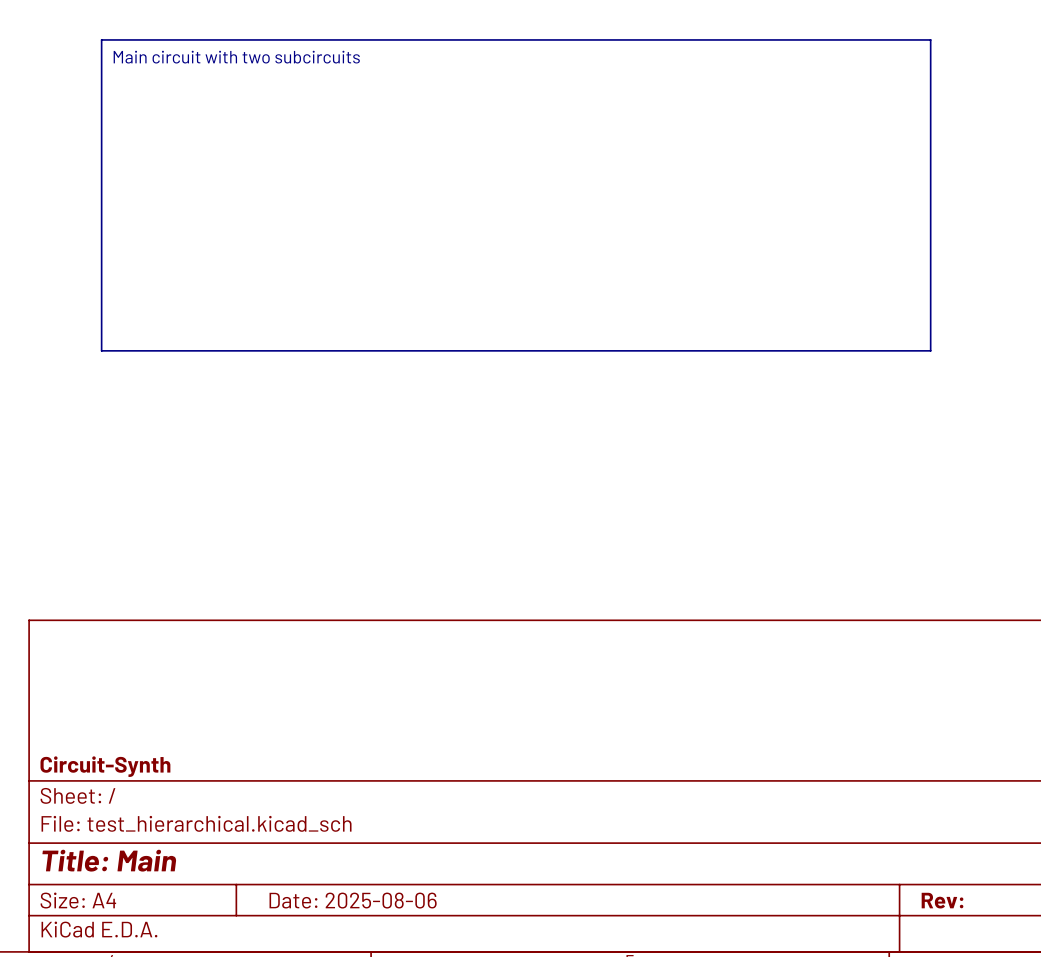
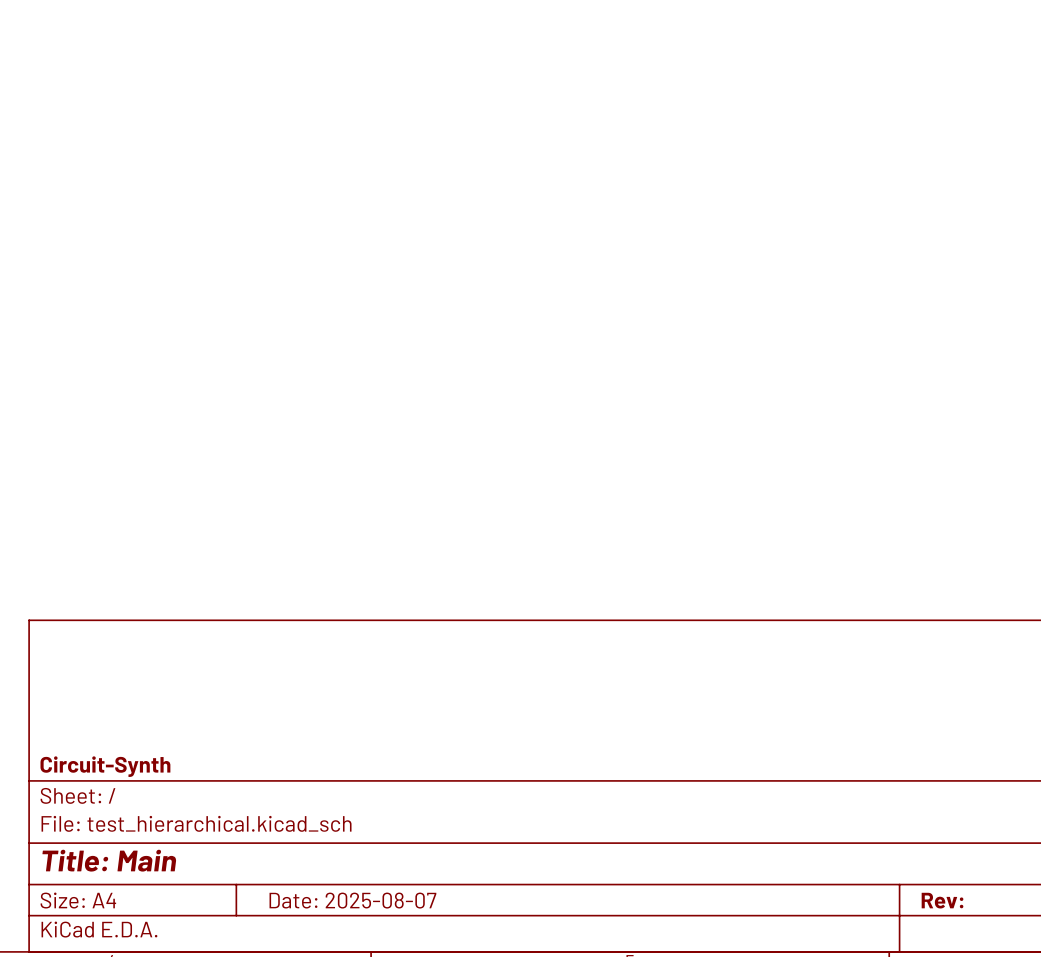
line: (101, 39) (930, 39) (930, 350) (101, 350) (101, 39) -> none
text: Main circuit with two subcircuits (236, 57) -> none
title block: Date: 2025-08-06 (353, 900) -> Date: 2025-08-07 (352, 900)

